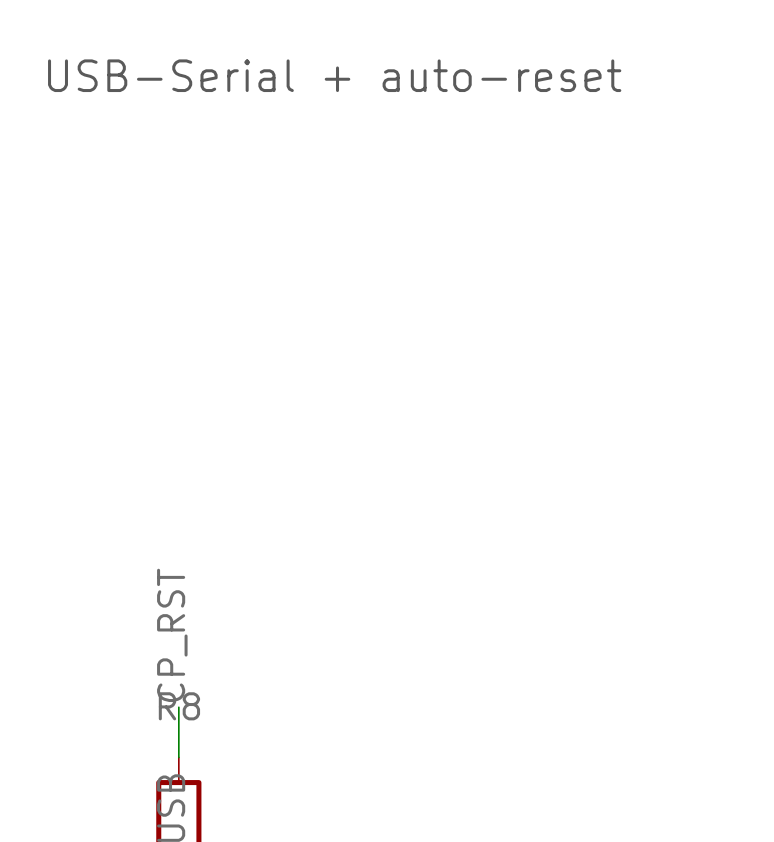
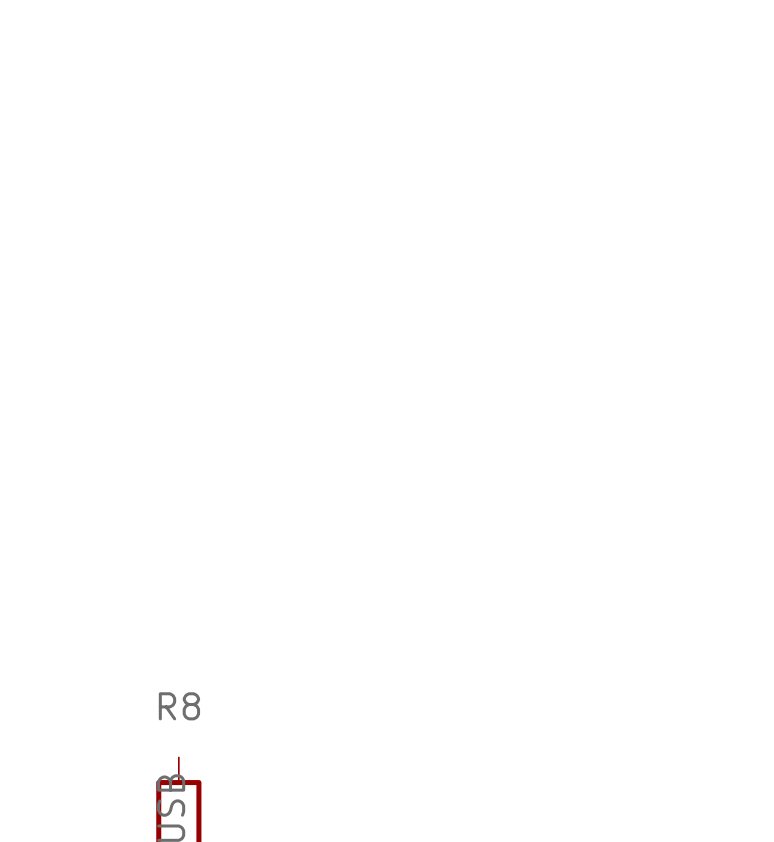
text: USB-Serial + auto-reset (334, 75) -> none
label: CP_RST (172, 635) -> none
wire: (178, 707) (178, 757) -> none

